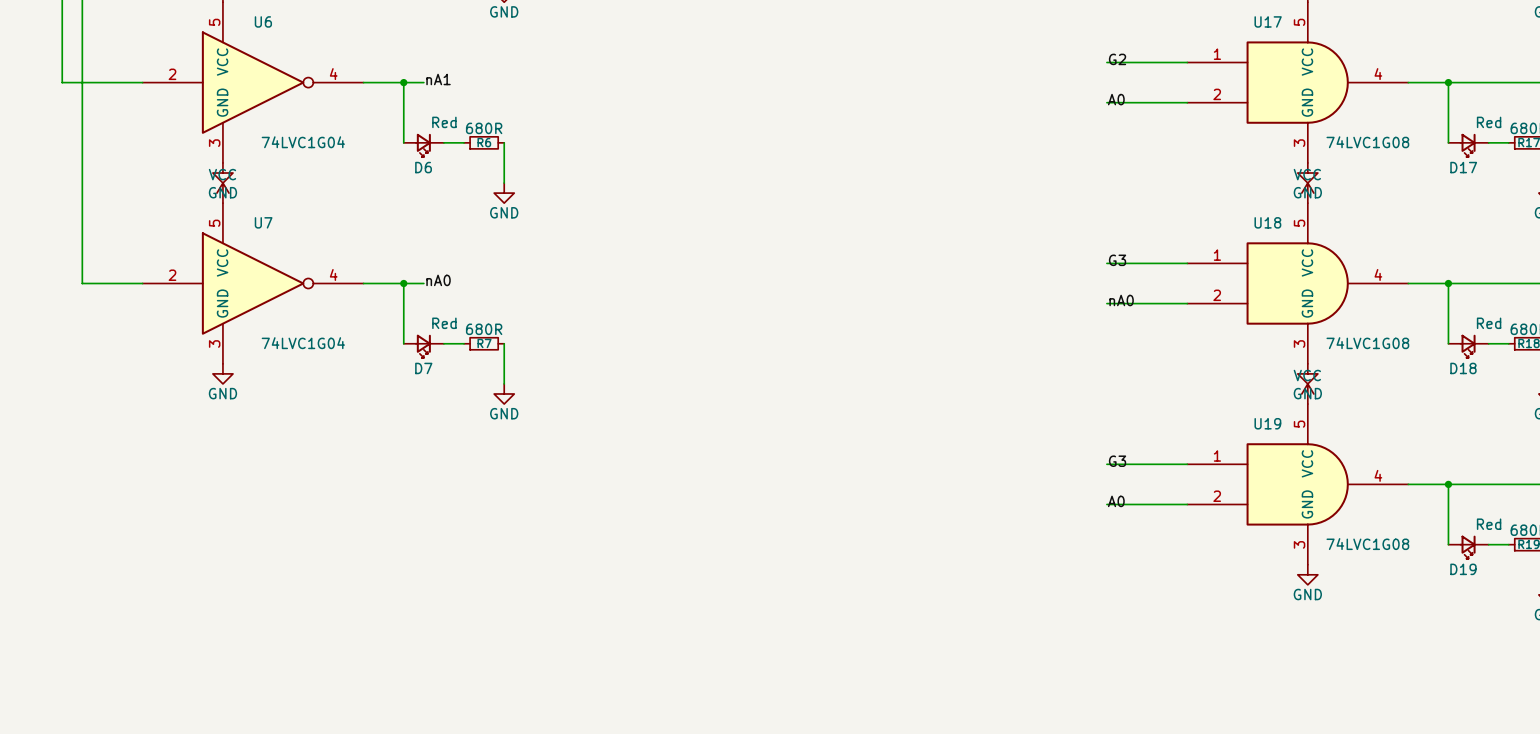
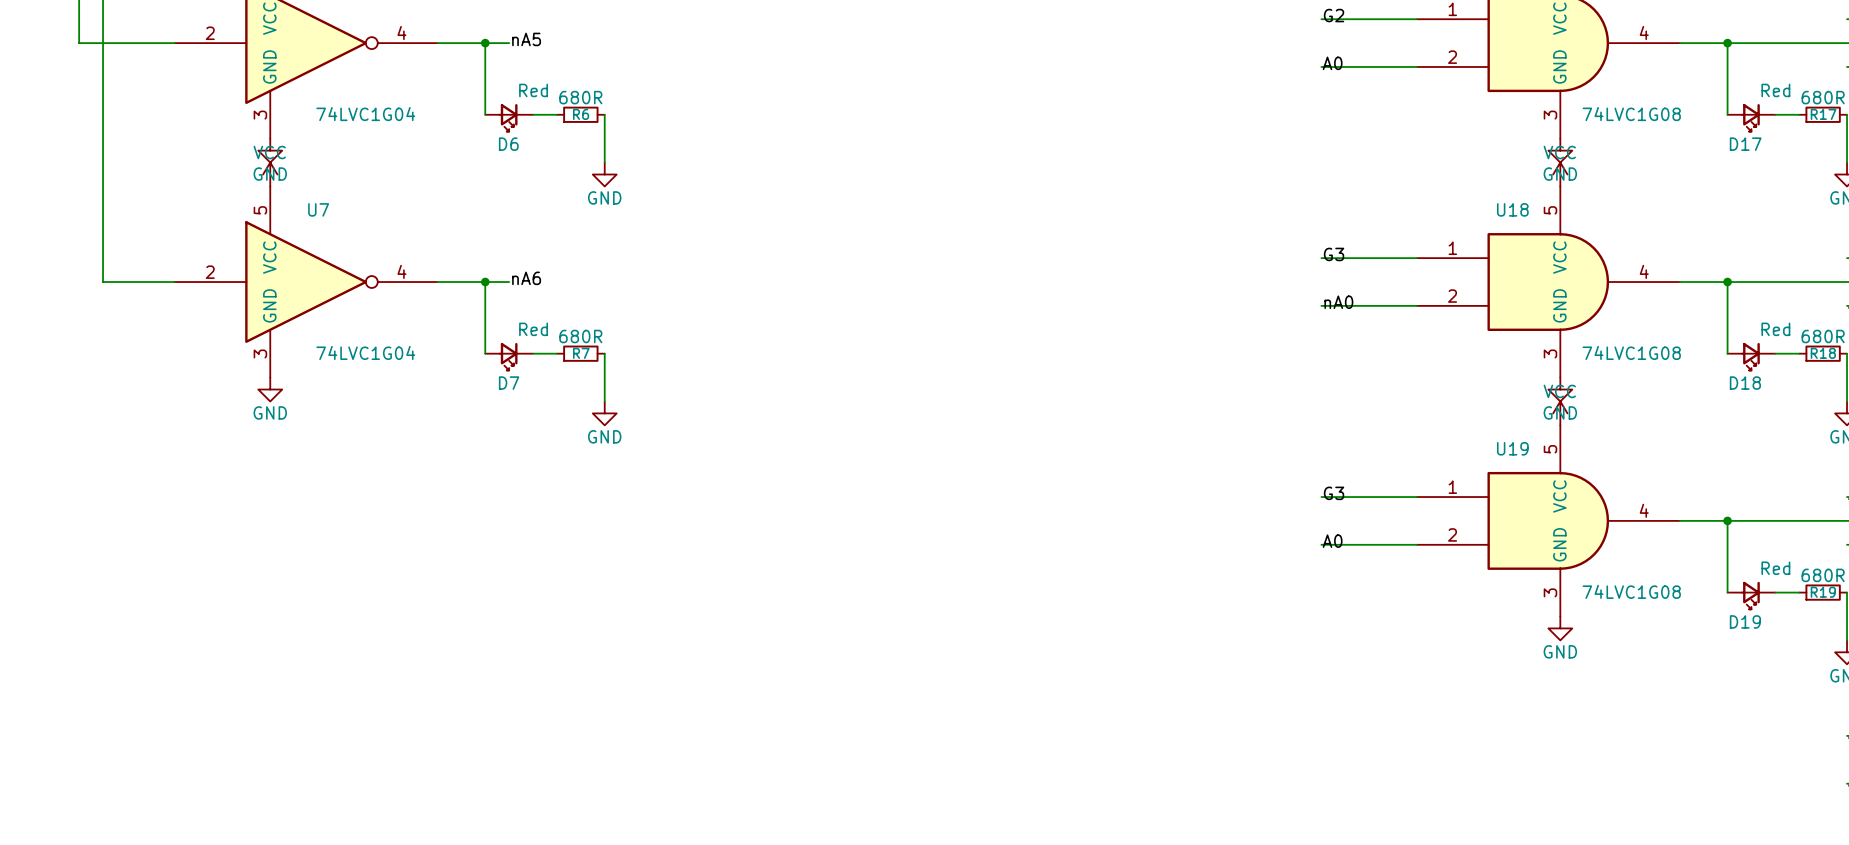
label: nA1 (438, 79) -> nA5 (526, 39)
label: nA0 (438, 280) -> nA6 (526, 278)

